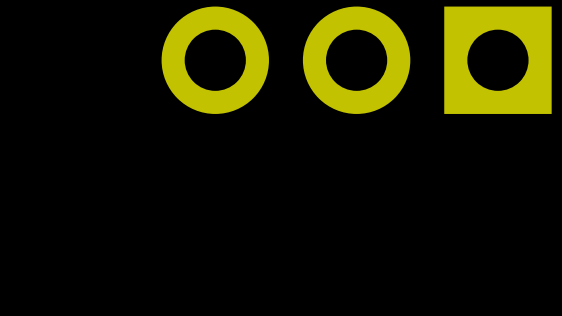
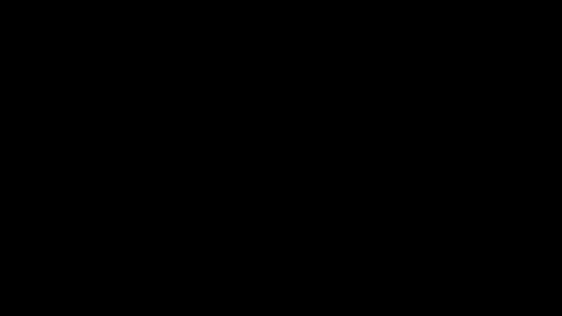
part: (356, 60) -> none

